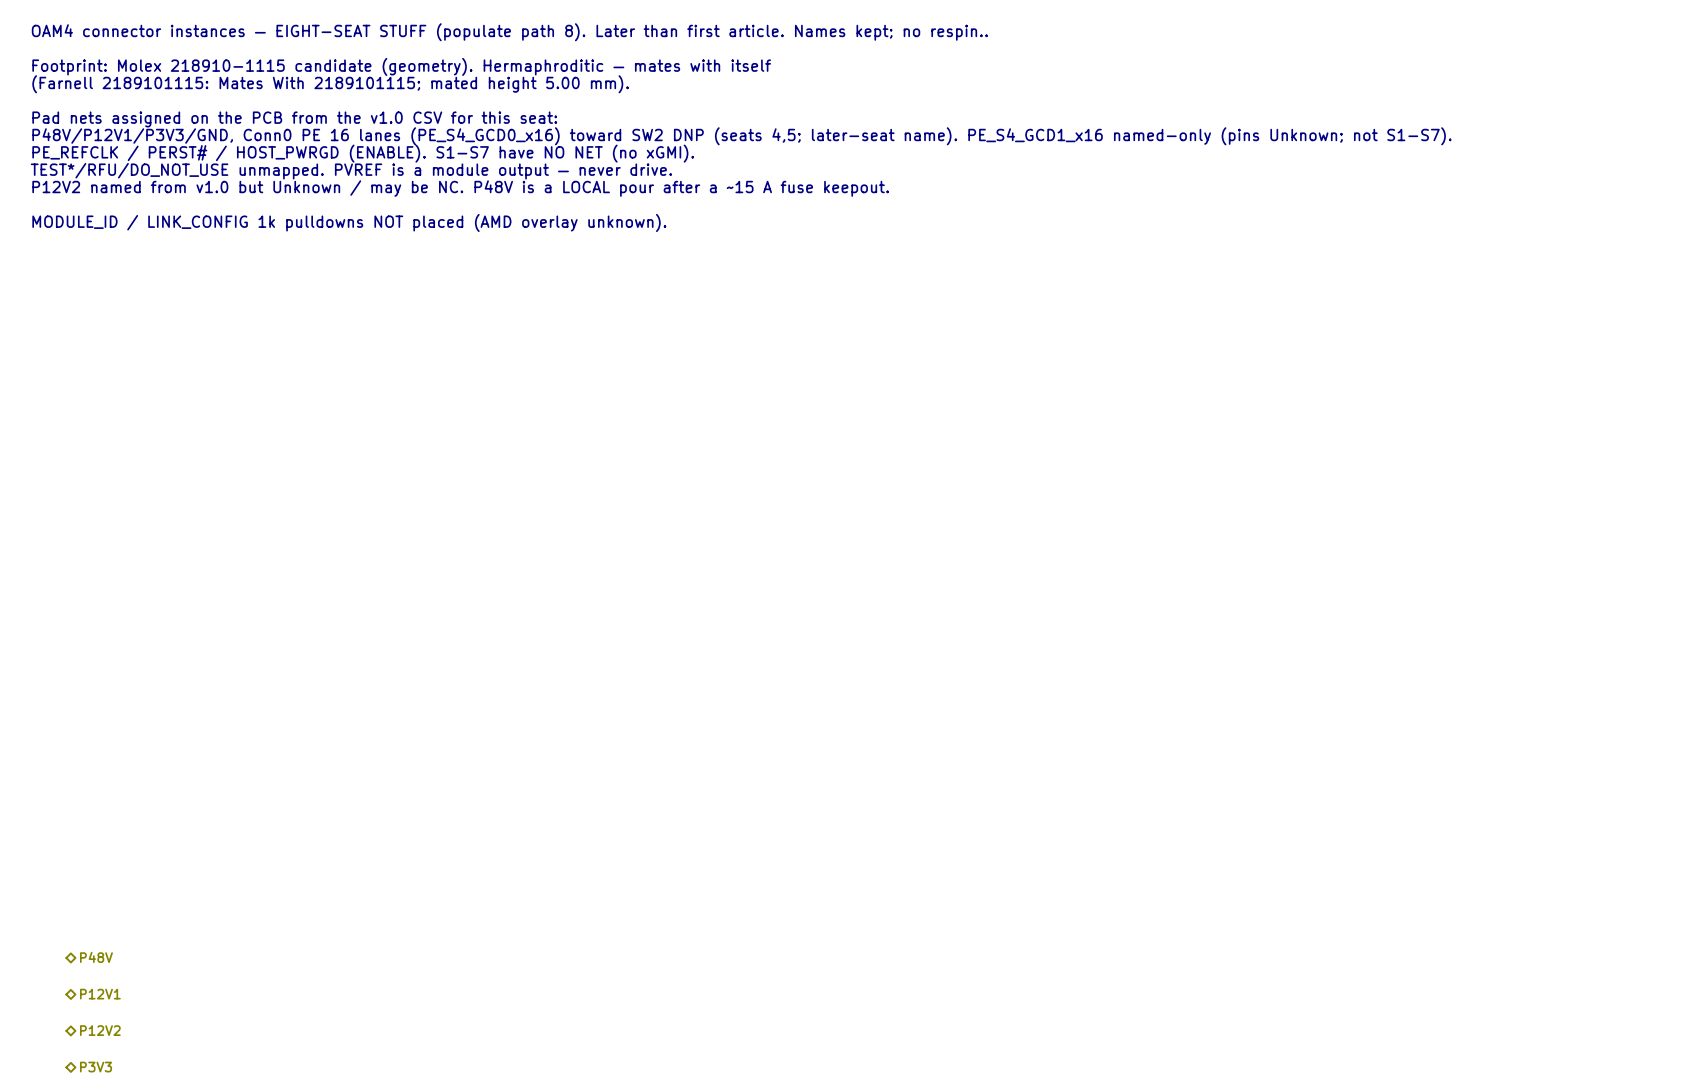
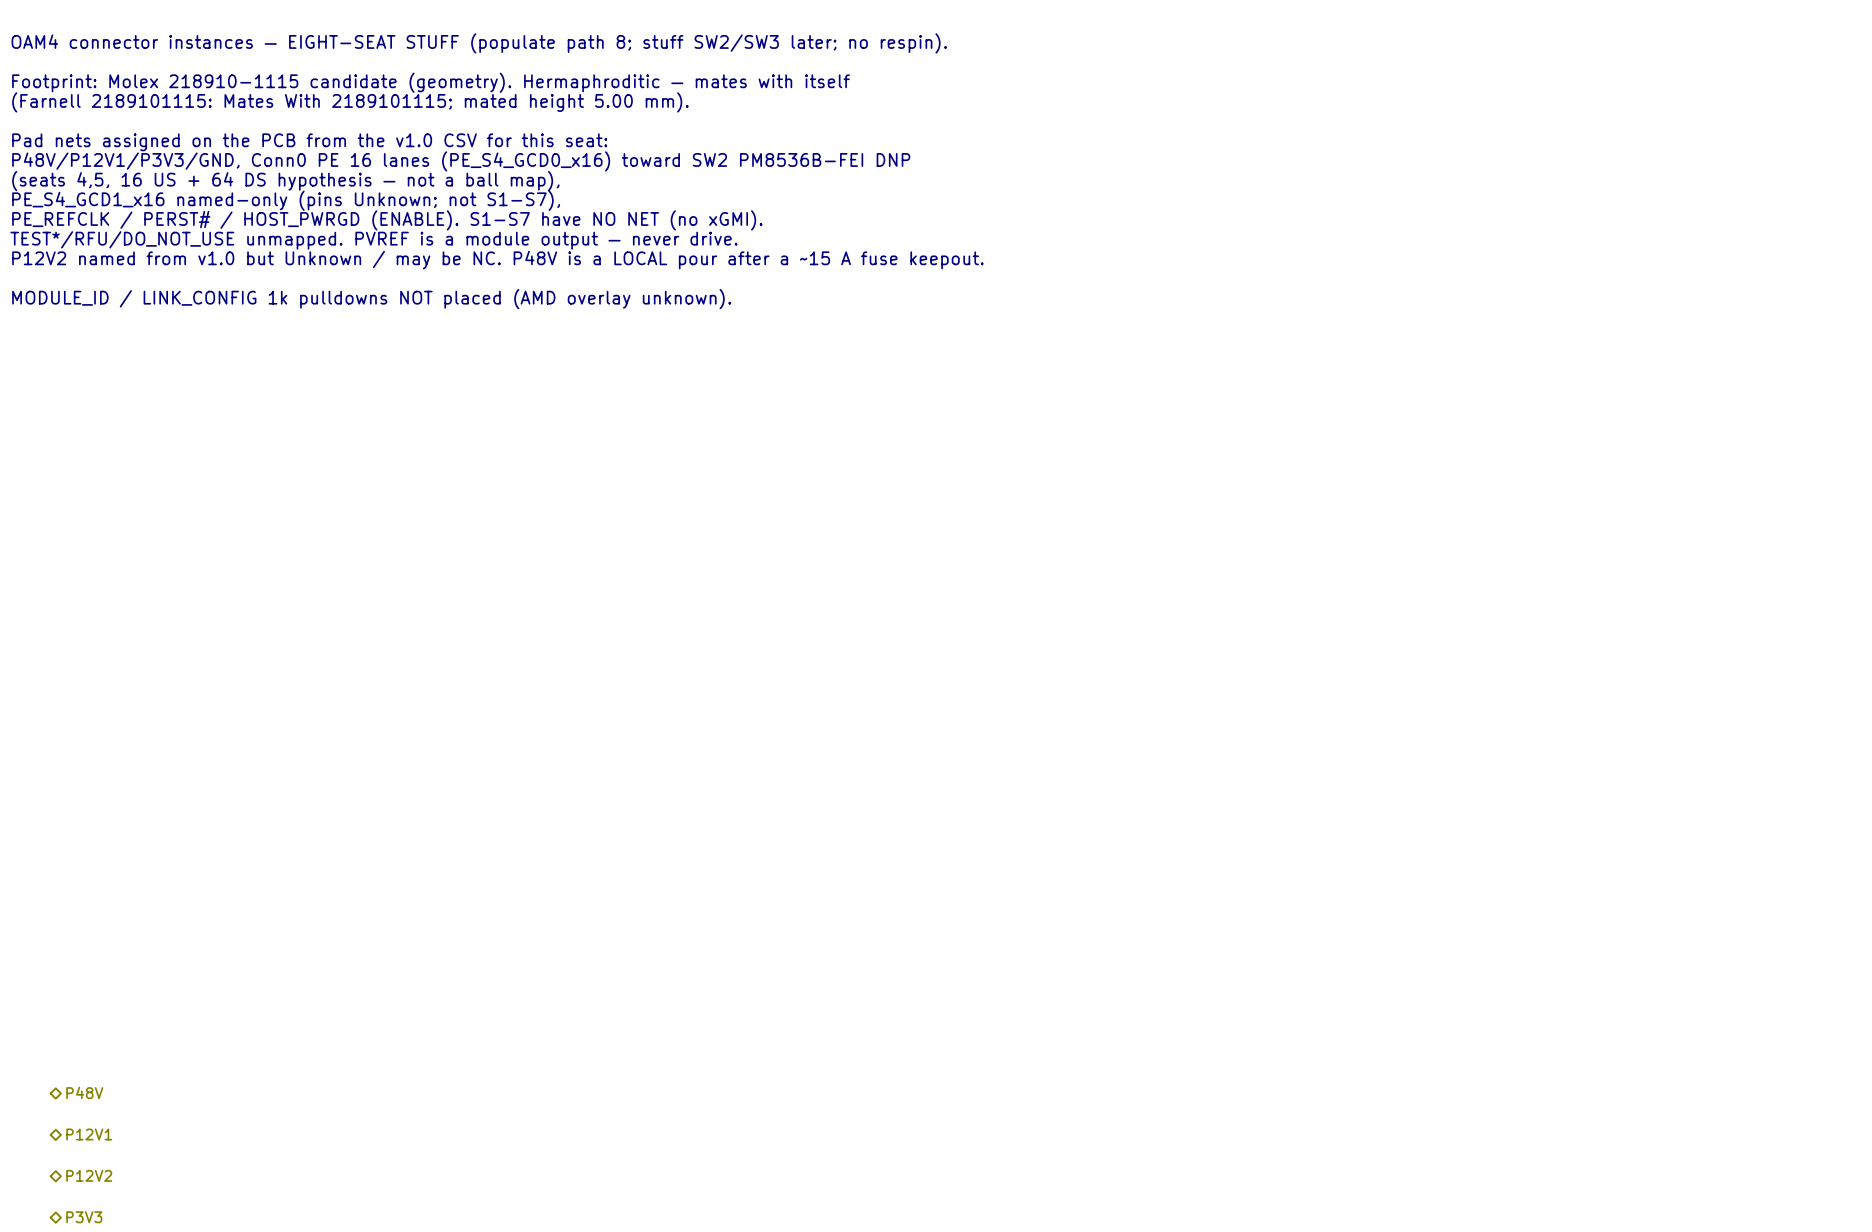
text: OAM4 connector instances — EIGHT-SEAT STUFF (populate path 8). Later than first article. Names kept; no respin.. (509, 32) -> OAM4 connector instances — EIGHT-SEAT STUFF (populate path 8; stuff SW2/SW3 later; no respin). (479, 43)
text: P48V/P12V1/P3V3/GND, Conn0 PE 16 lanes (PE_S4_GCD0_x16) toward SW2 DNP (seats 4,5; later-seat name). PE_S4_GCD1_x16 named-only (pins Unknown; not S1-S7). (741, 136) -> P48V/P12V1/P3V3/GND, Conn0 PE 16 lanes (PE_S4_GCD0_x16) toward SW2 PM8536B-FEI DNP (461, 161)
text: PE_REFCLK / PERST# / HOST_PWRGD (ENABLE). S1-S7 have NO NET (no xGMI). (363, 153) -> (seats 4,5, 16 US + 64 DS hypothesis — not a ball map), (285, 181)
text: TEST*/RFU/DO_NOT_USE unmapped. PVREF is a module output — never drive. (351, 171) -> PE_S4_GCD1_x16 named-only (pins Unknown; not S1-S7), (286, 200)
text: P12V2 named from v1.0 but Unknown / may be NC. P48V is a LOCAL pour after a ~15 A fuse keepout. (460, 188) -> PE_REFCLK / PERST# / HOST_PWRGD (ENABLE). S1-S7 have NO NET (no xGMI). (387, 220)
text: none -> TEST*/RFU/DO_NOT_USE unmapped. PVREF is a module output — never drive. (373, 240)
text: MODULE_ID / LINK_CONFIG 1k pulldowns NOT placed (AMD overlay unknown). (349, 222) -> P12V2 named from v1.0 but Unknown / may be NC. P48V is a LOCAL pour after a ~15 A fuse keepout. (497, 260)
text: none -> MODULE_ID / LINK_CONFIG 1k pulldowns NOT placed (AMD overlay unknown). (371, 299)

